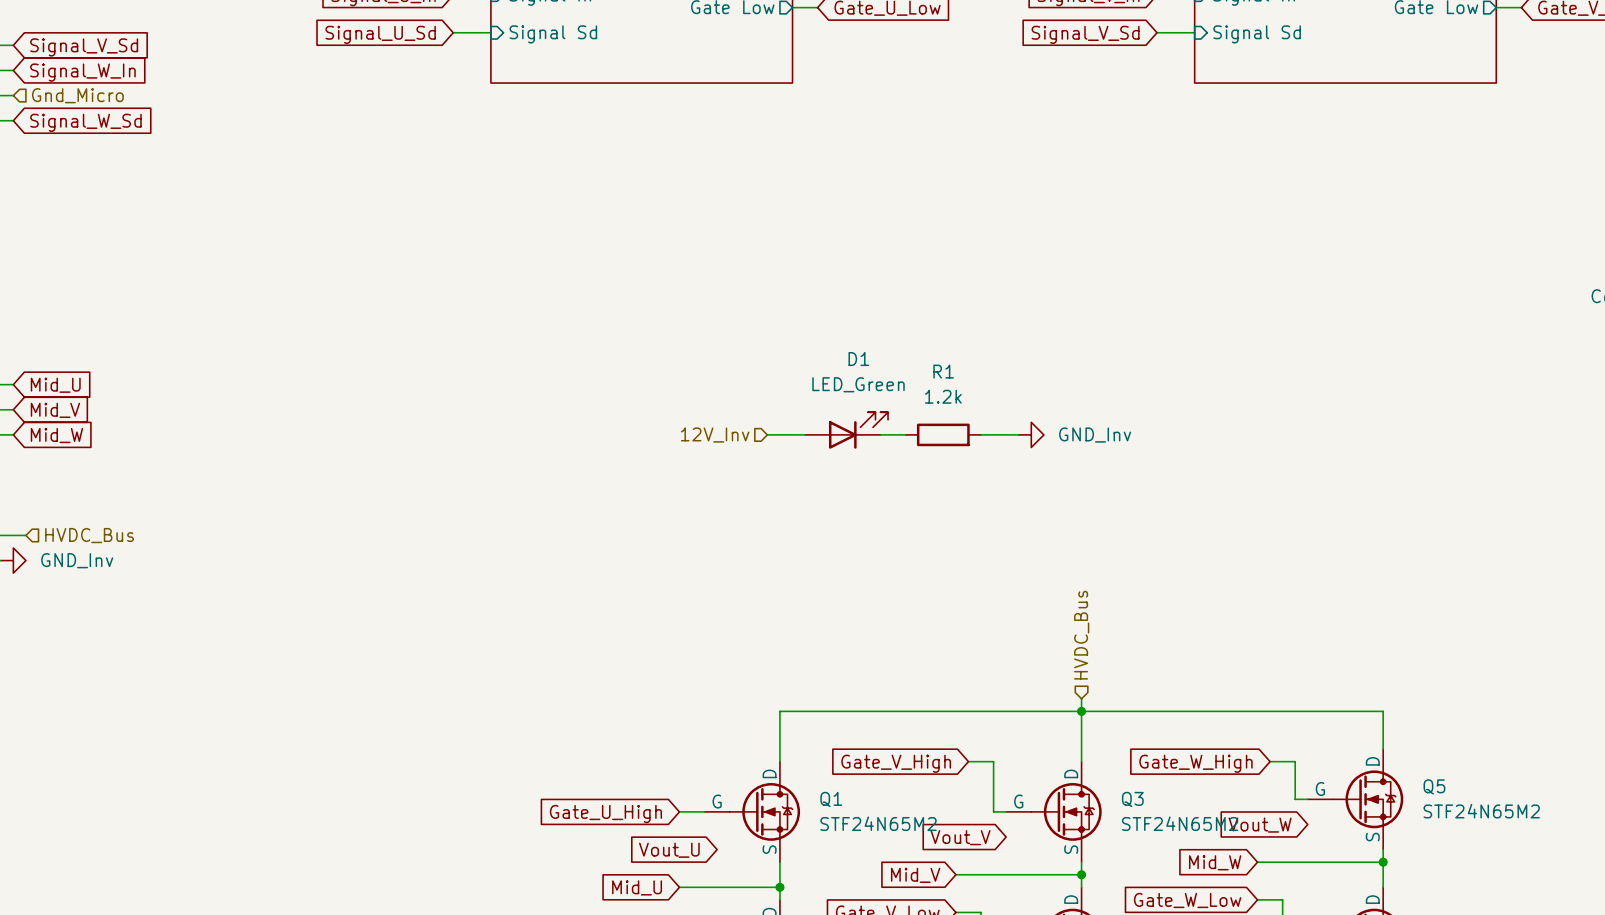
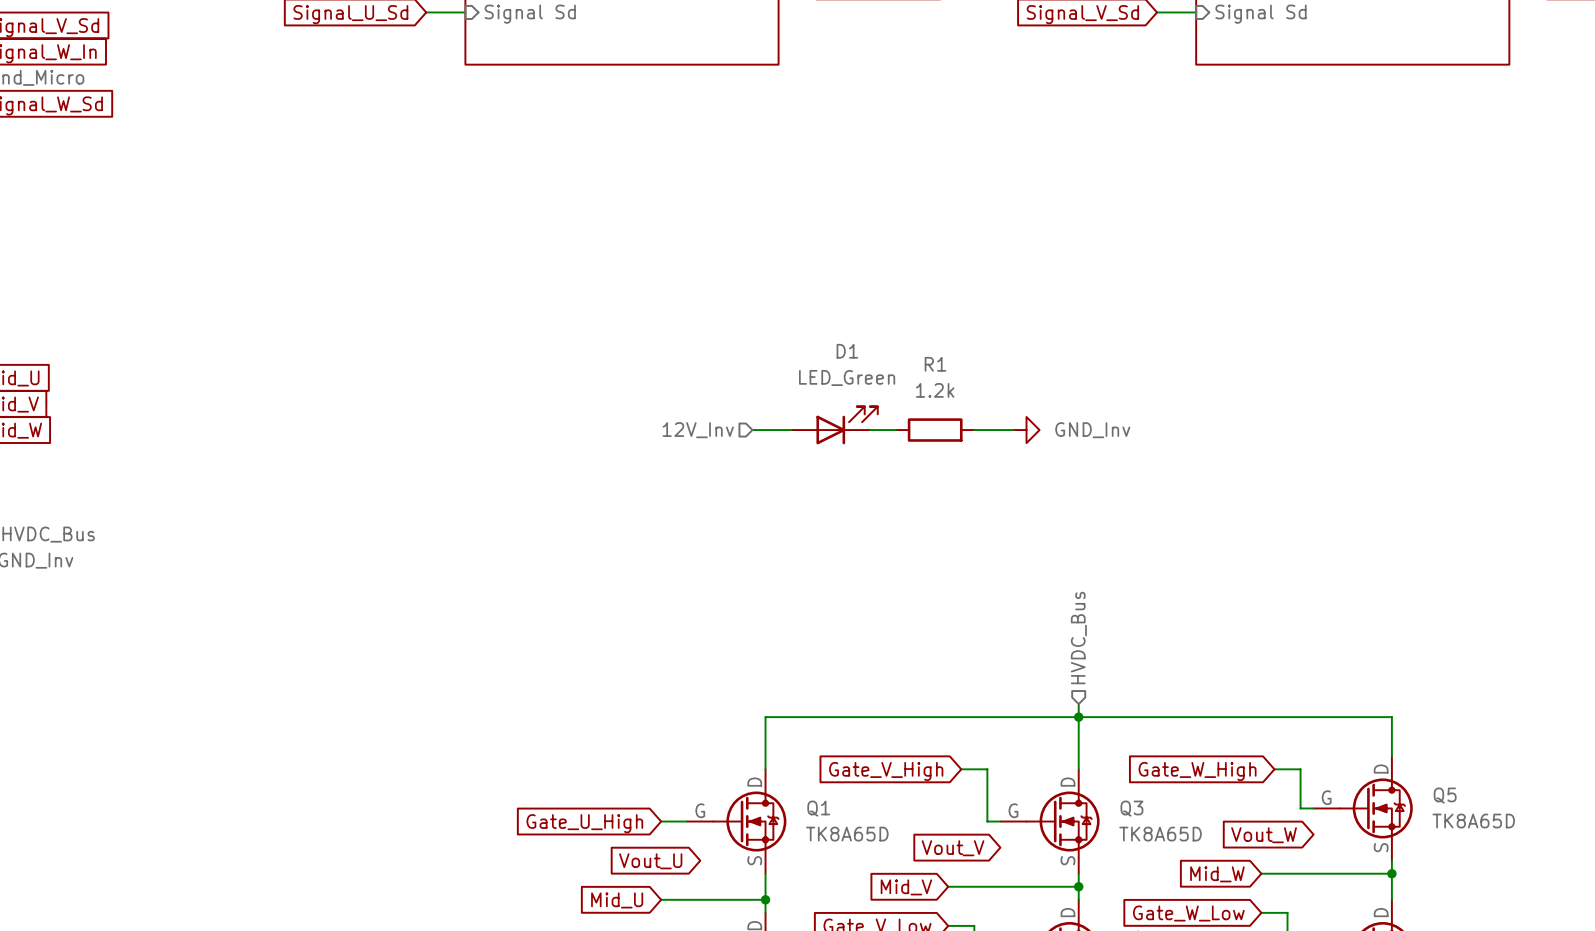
Q5 value: STF24N65M2 (1481, 811) -> TK8A65D (1473, 821)
Q1 value: STF24N65M2 (878, 823) -> TK8A65D (847, 834)
Q3 value: STF24N65M2 (1180, 823) -> TK8A65D (1160, 834)

